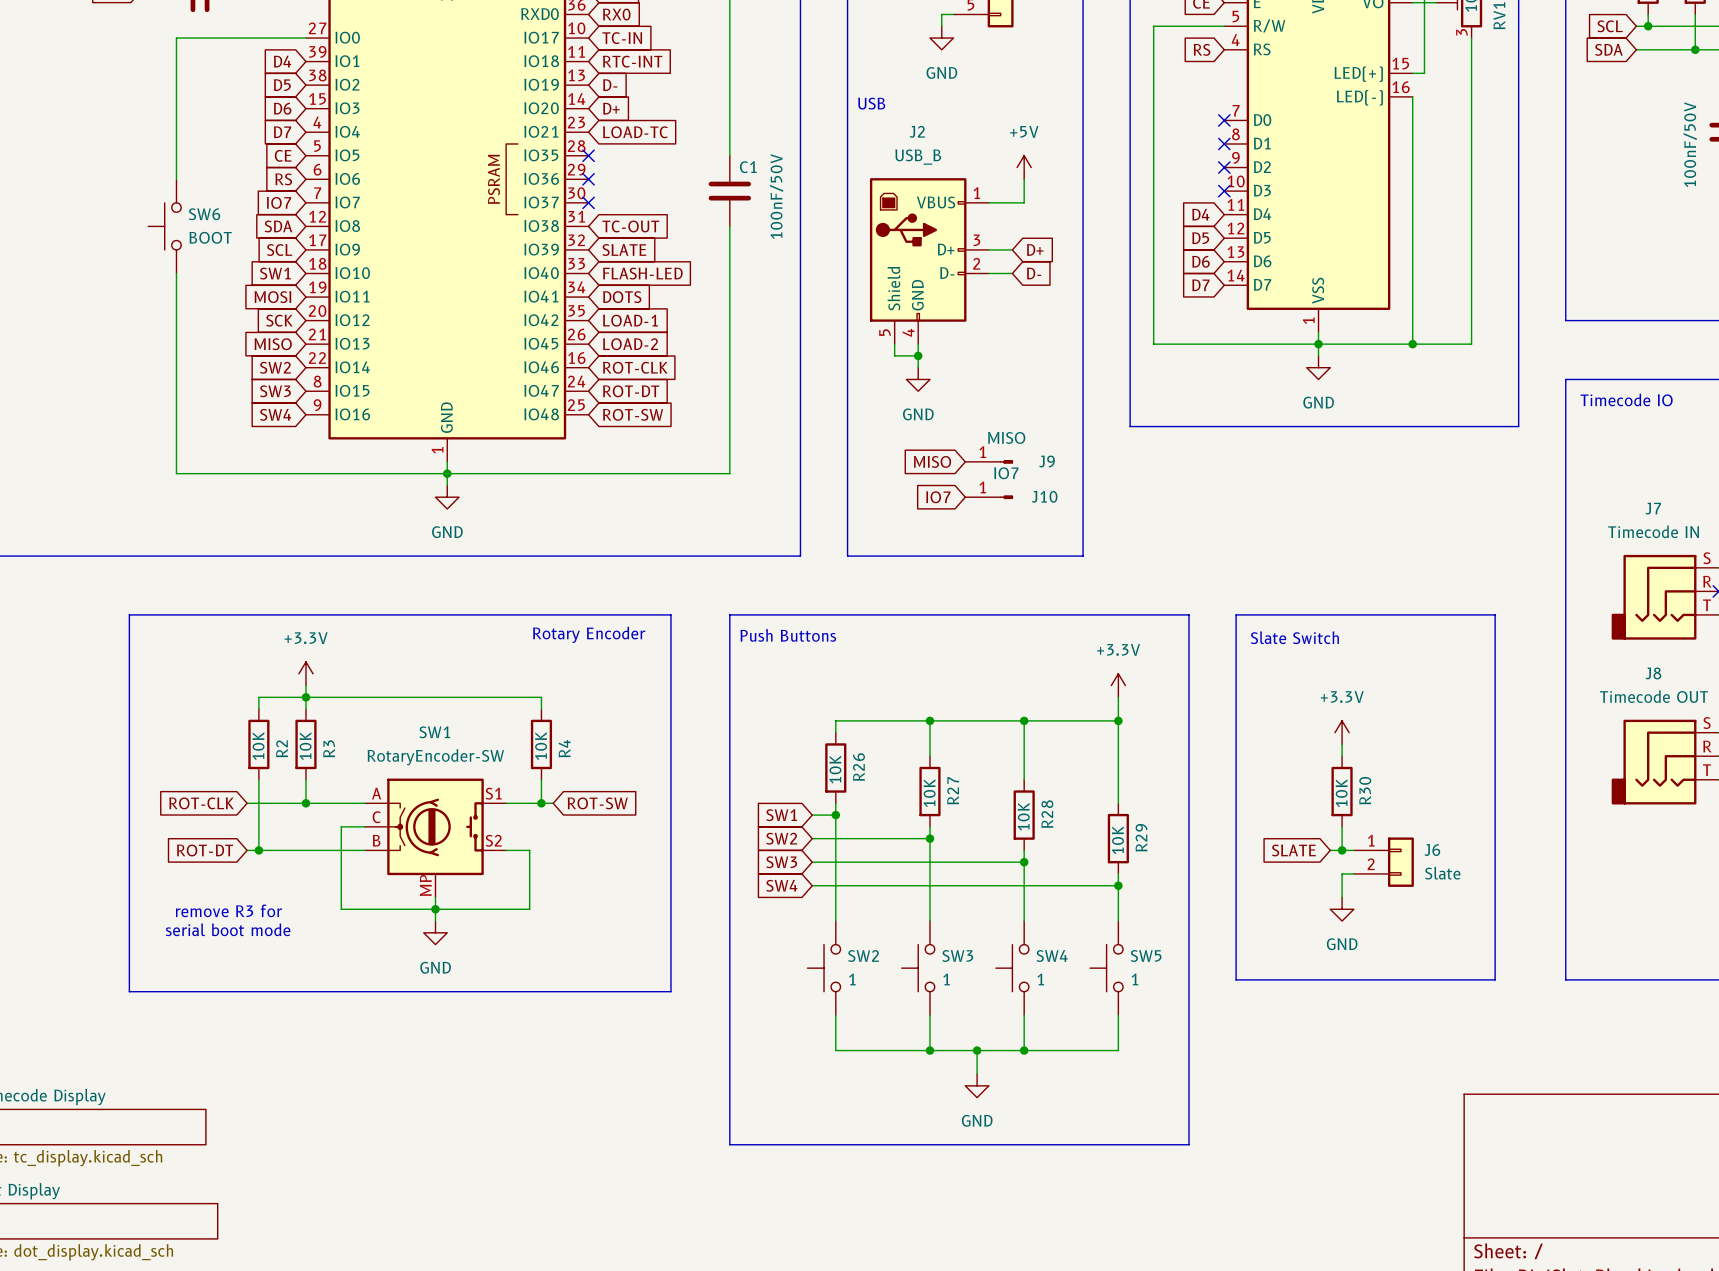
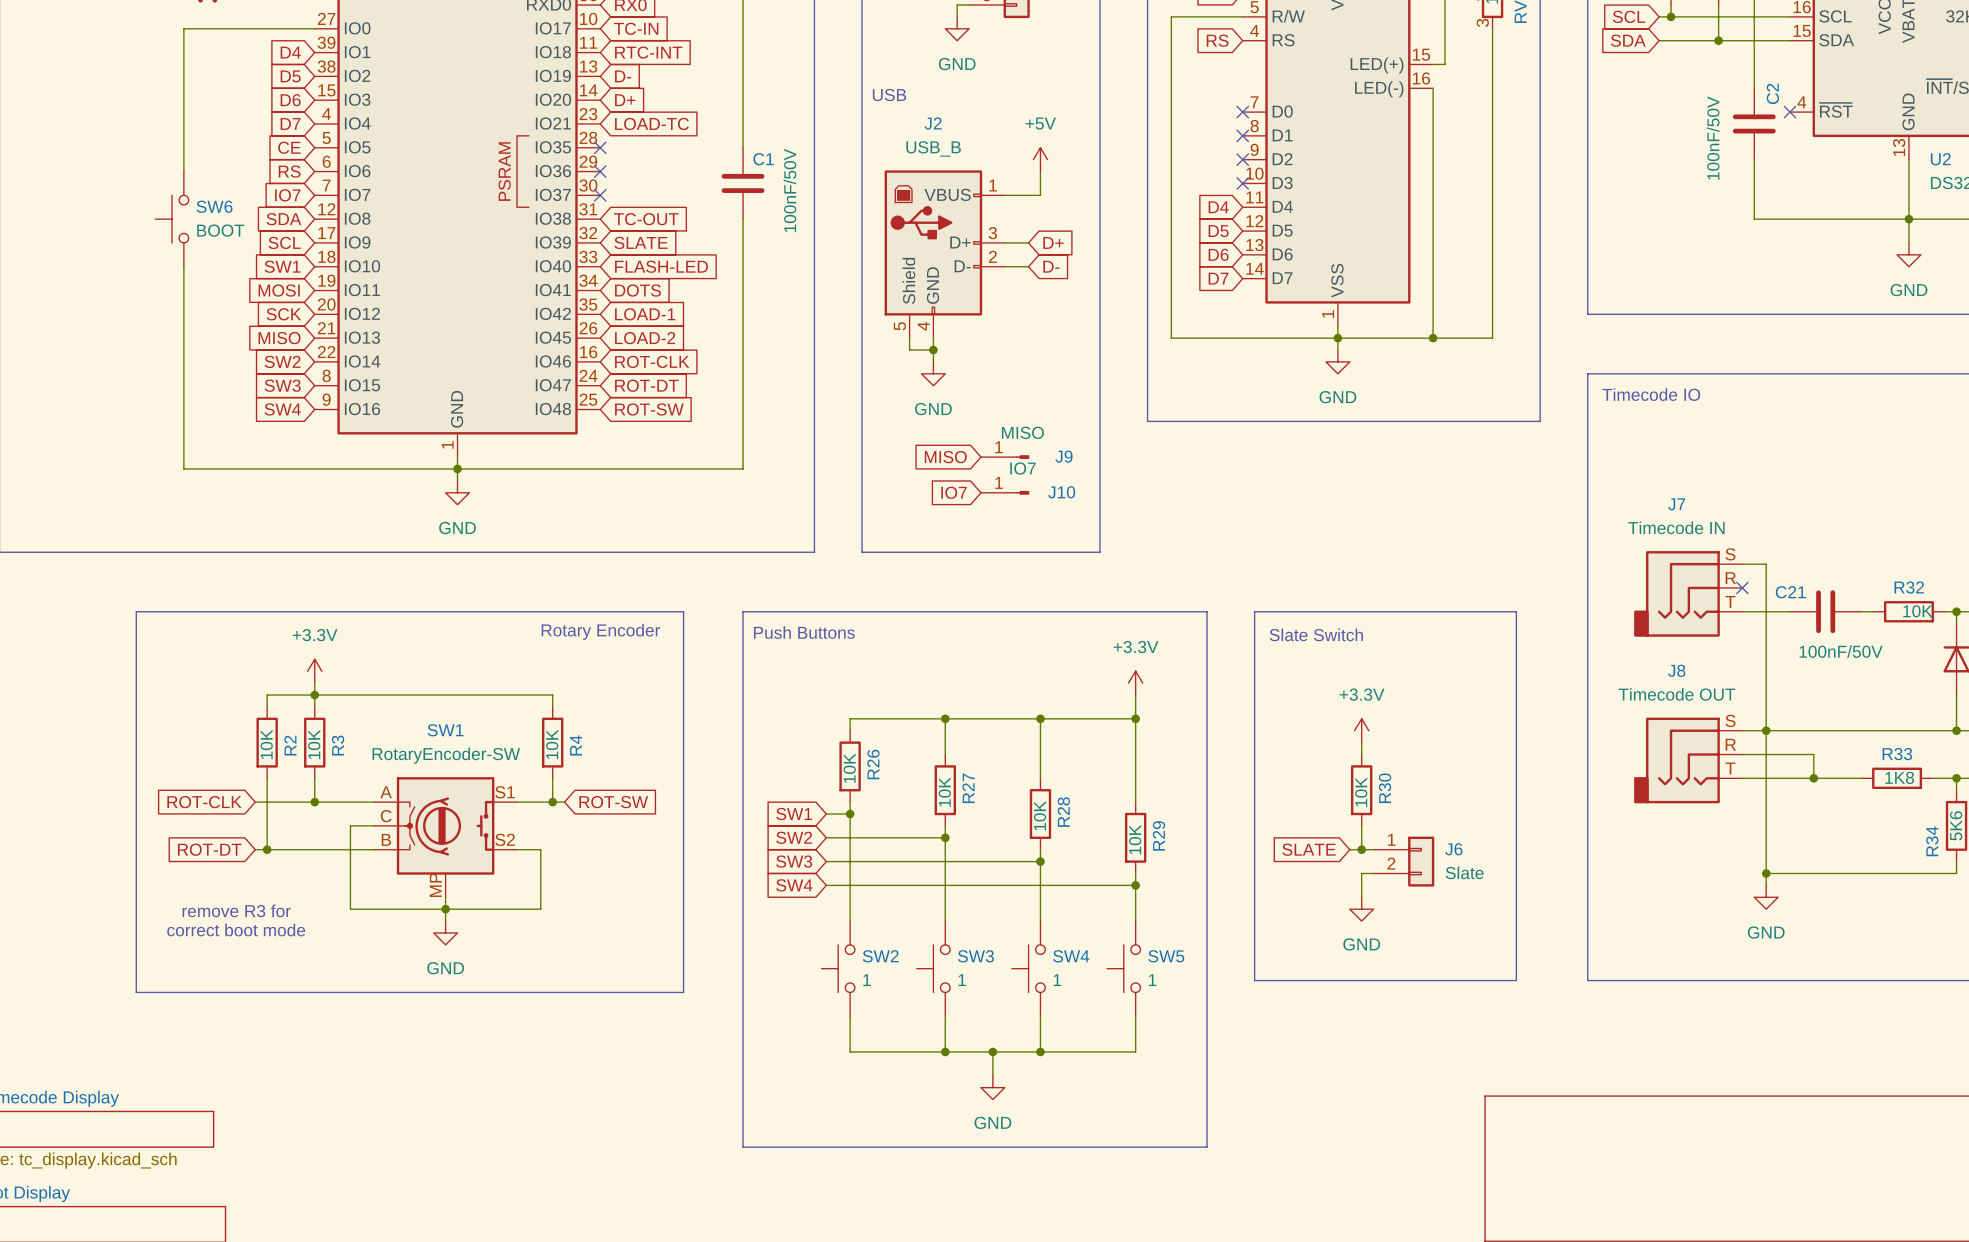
text: serial boot mode (228, 929) -> correct boot mode (236, 930)

